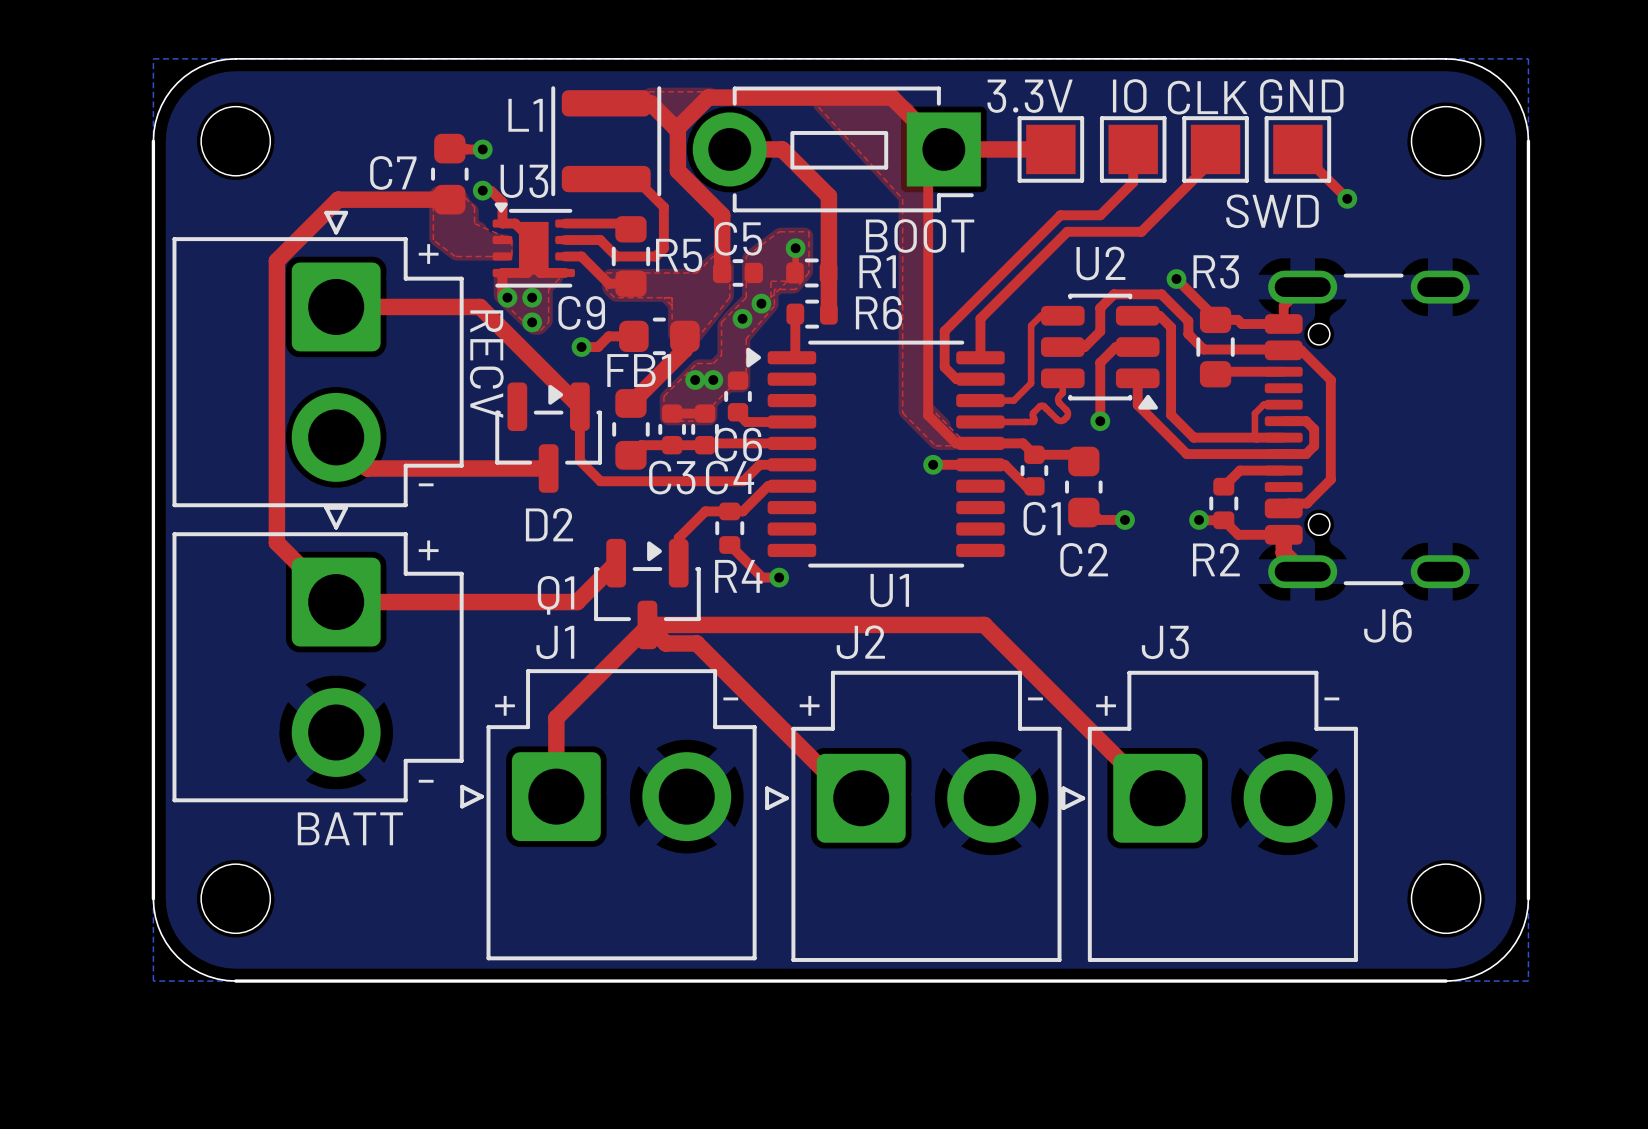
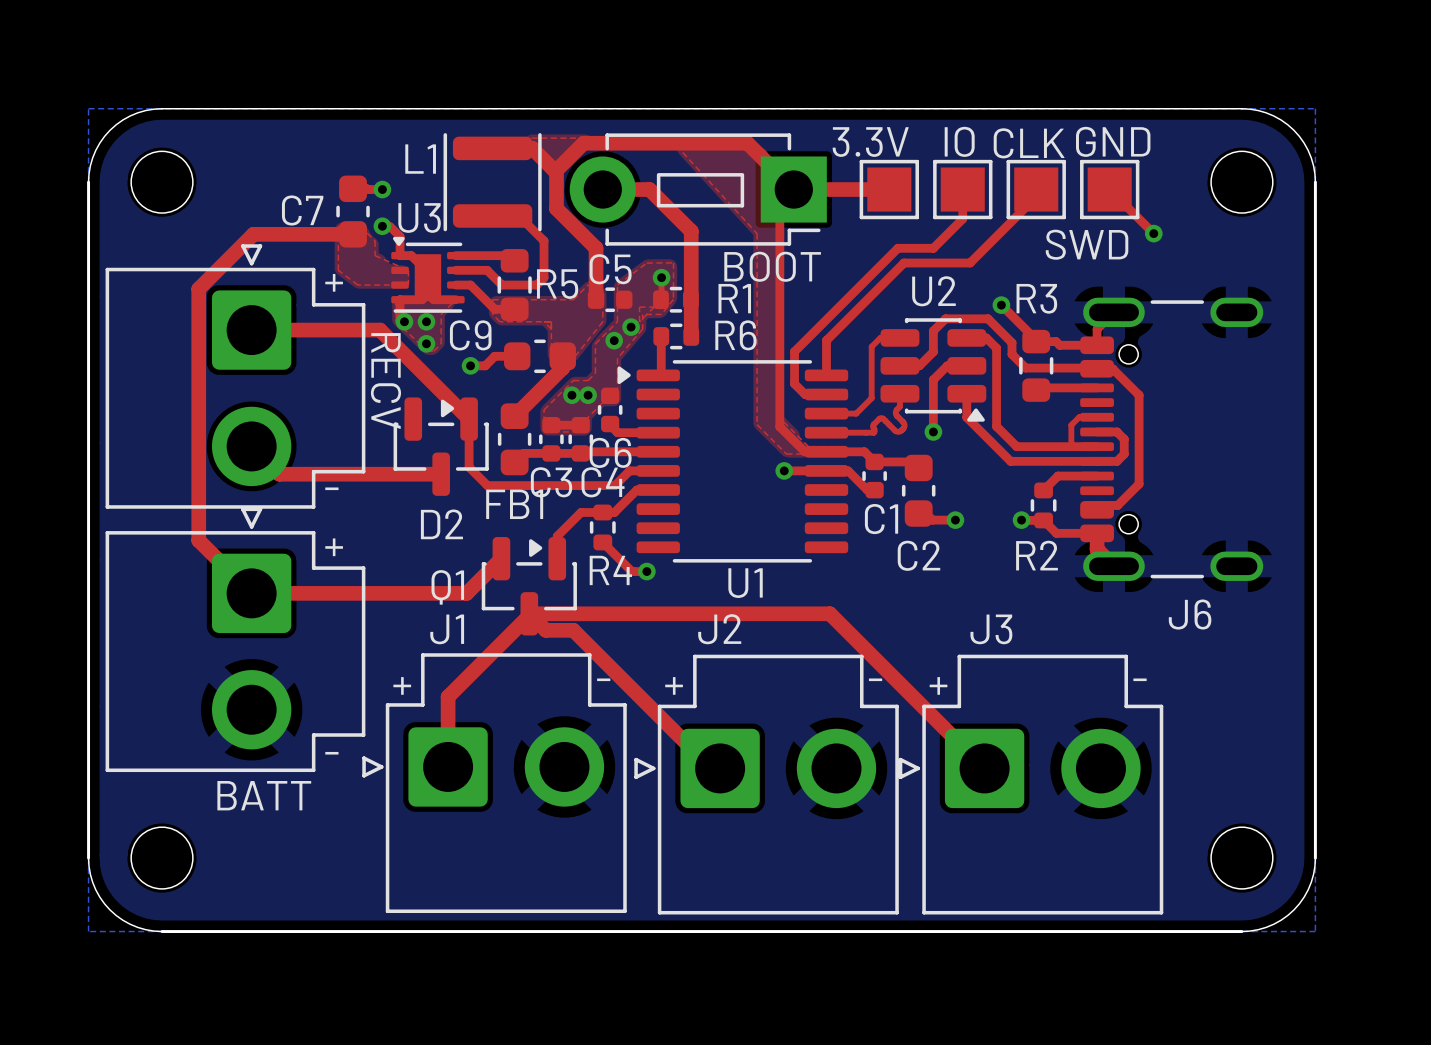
FB1 name position: FB1 (639, 370) -> FB1 (514, 504)

